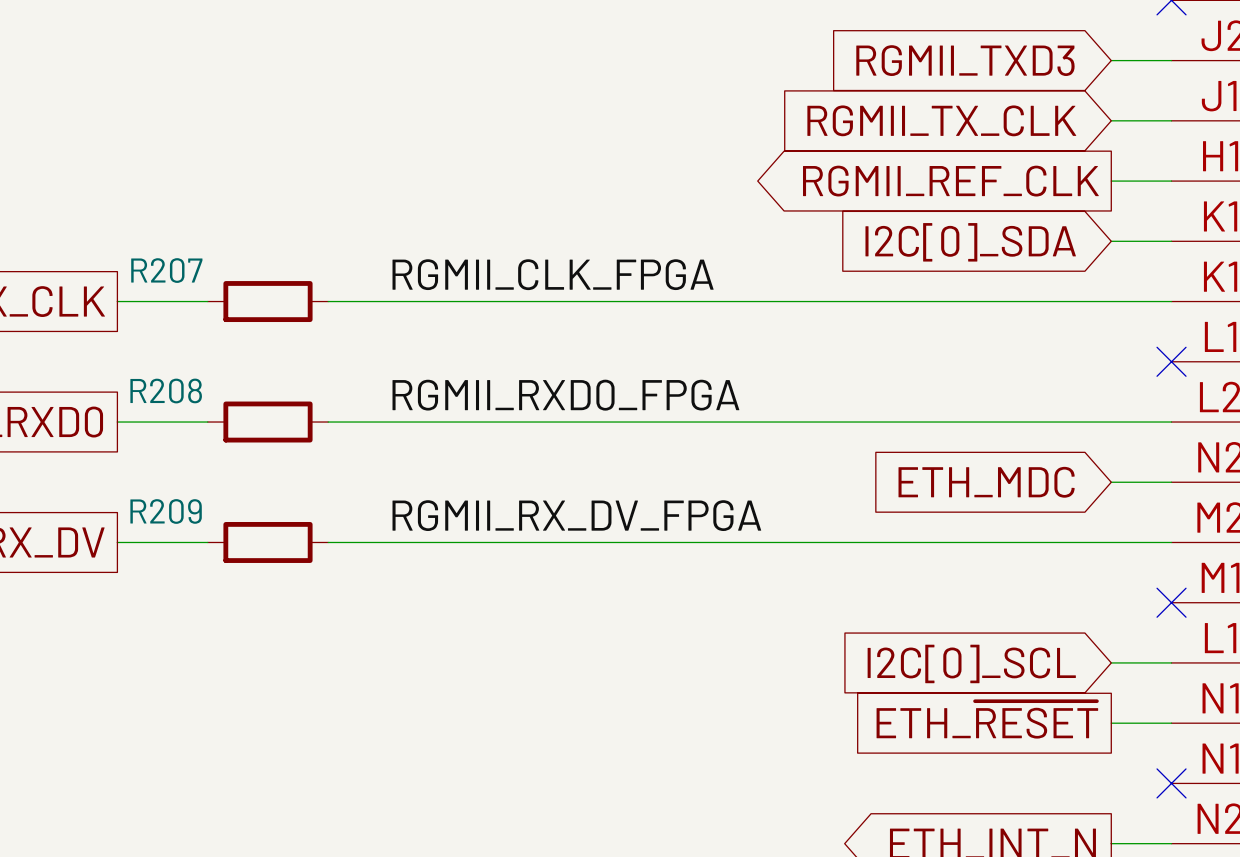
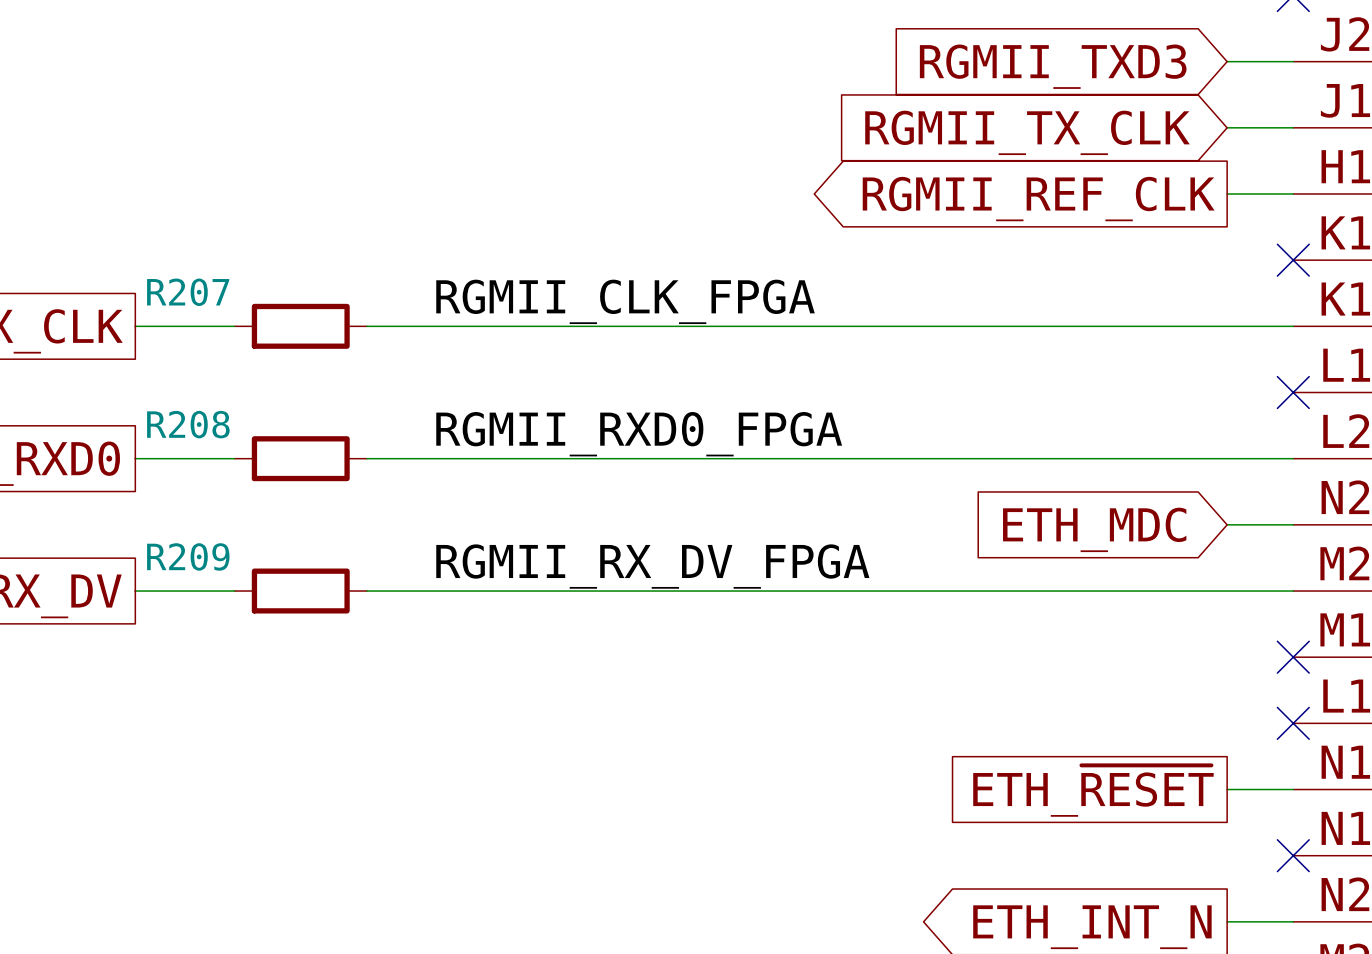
wire: (1111, 241) (1171, 241) -> none
no-connect mark: none -> (1293, 260)
global label: I2C[0]_SDA (970, 242) -> none
wire: (1111, 662) (1171, 662) -> none
no-connect mark: none -> (1293, 723)
global label: I2C[0]_SCL (971, 663) -> none

